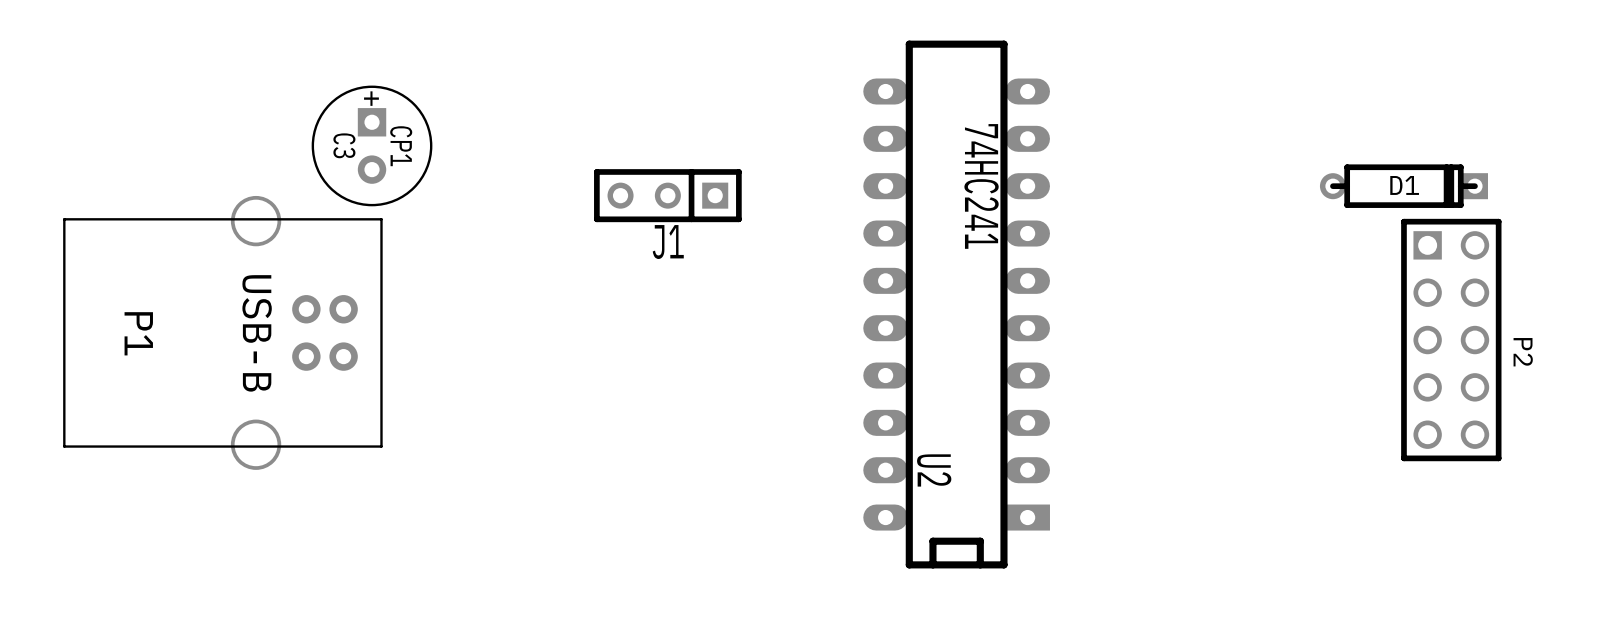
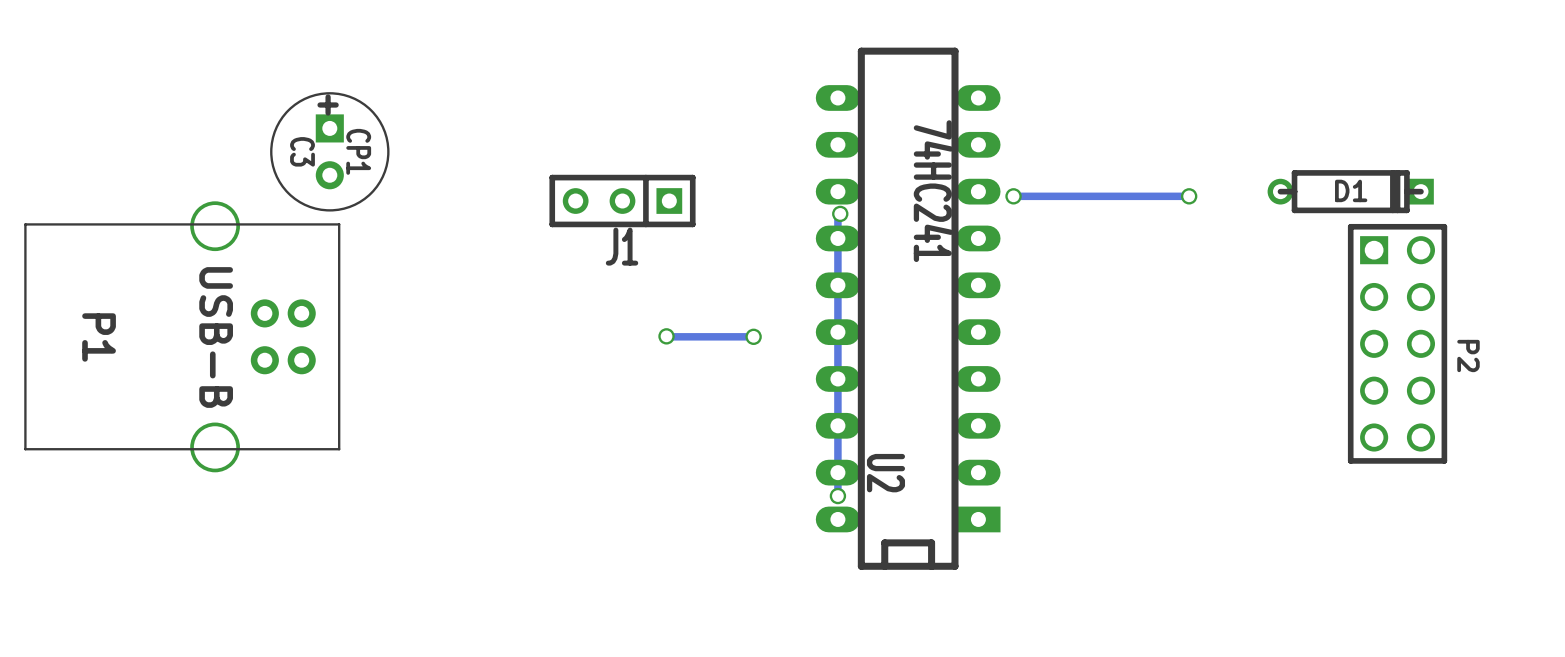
via: none -> (1013, 196)
track: none -> (1189, 196) (1013, 196)
via: none -> (1189, 196)
track: none -> (840, 213) (837, 216) (837, 496)
via: none -> (840, 213)
track: none -> (666, 336) (753, 336)
via: none -> (666, 336)
via: none -> (753, 336)
via: none -> (837, 496)

